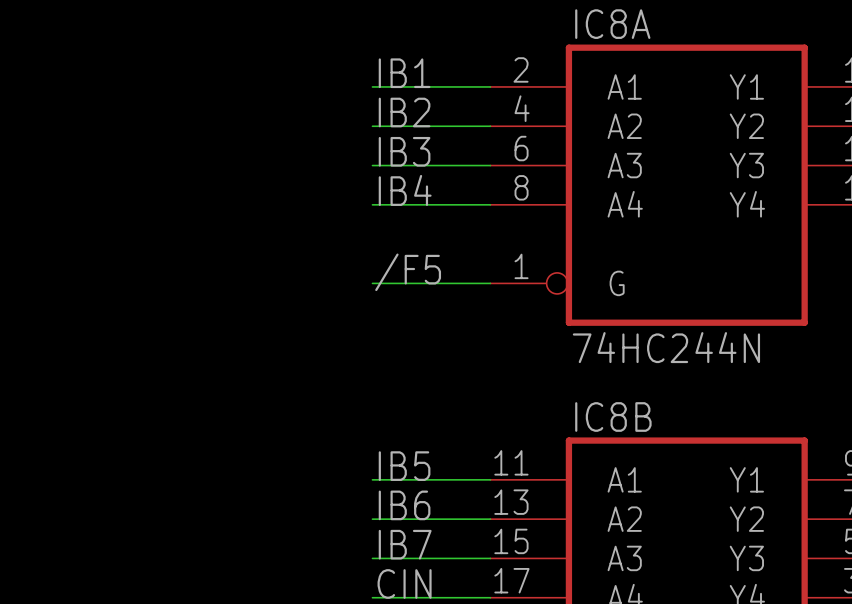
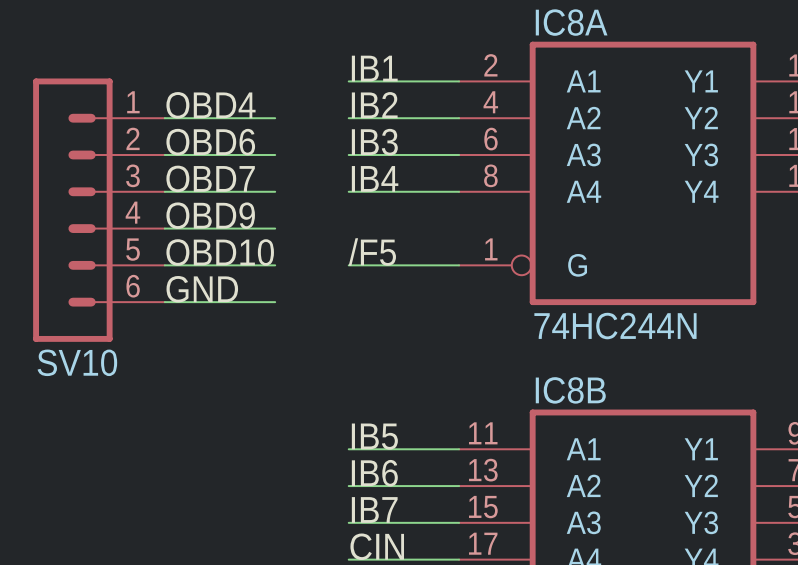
label: none -> OBD4 (210, 105)
wire: none -> (164, 118) (275, 118)
label: none -> OBD6 (210, 142)
wire: none -> (164, 155) (275, 155)
label: none -> OBD7 (210, 178)
wire: none -> (164, 191) (275, 191)
SV10: none -> (98, 210)
label: none -> OBD9 (210, 215)
wire: none -> (164, 228) (275, 228)
label: none -> OBD10 (220, 252)
wire: none -> (164, 265) (275, 265)
label: none -> GND (202, 289)
wire: none -> (164, 302) (275, 302)

